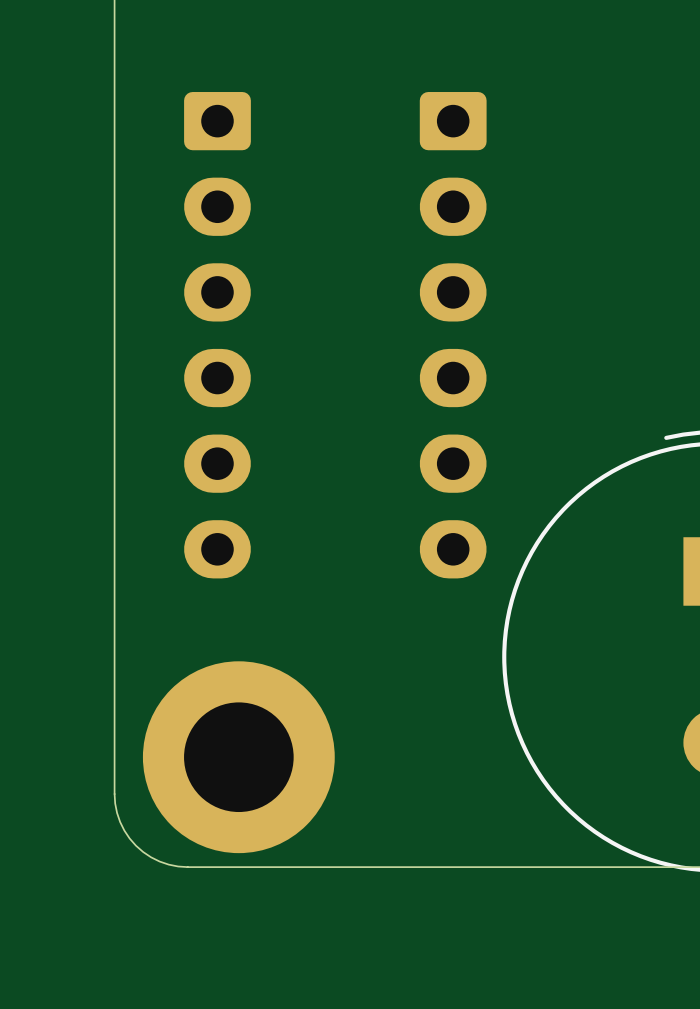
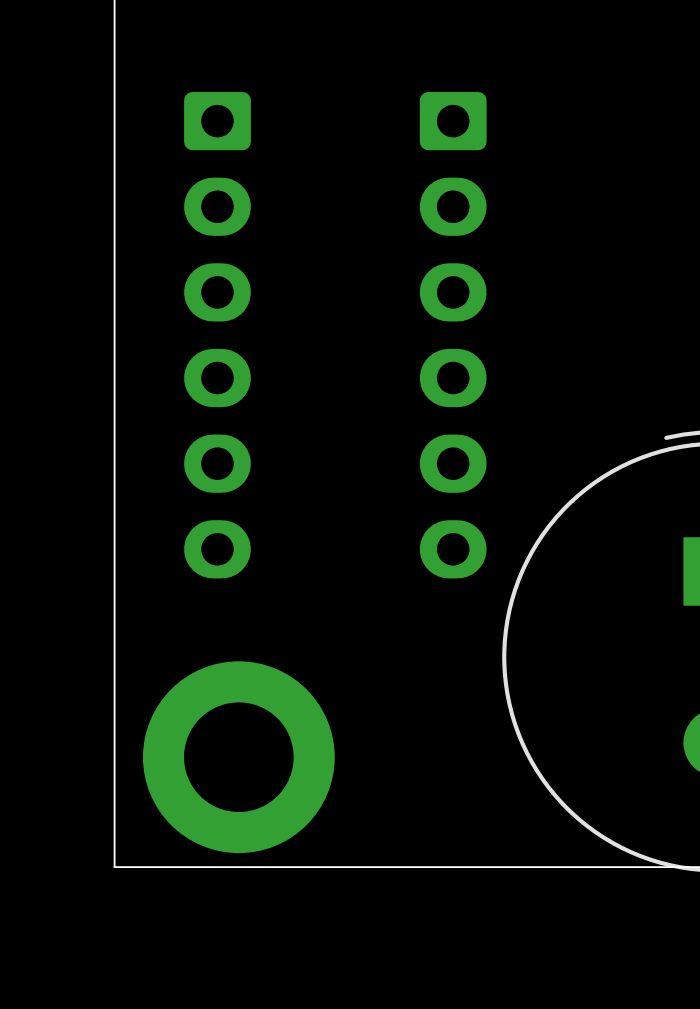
board edge: (114, 794) (120, 822) (135, 845) (159, 861) (187, 867) -> (114, 794) (114, 867) (187, 867)

